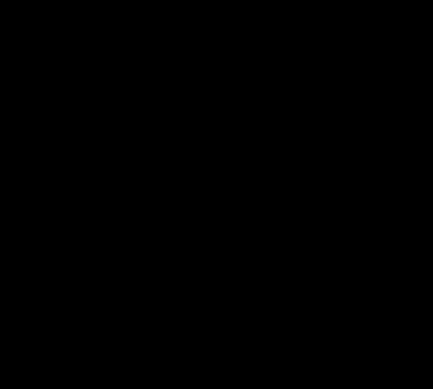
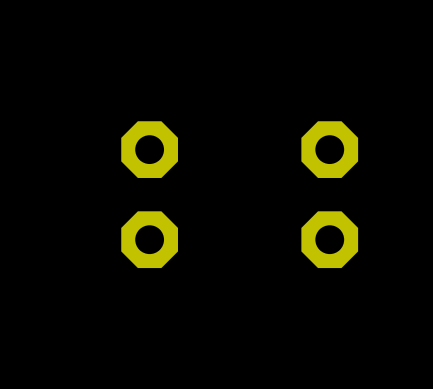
part: none -> (149, 194)
part: none -> (329, 194)

